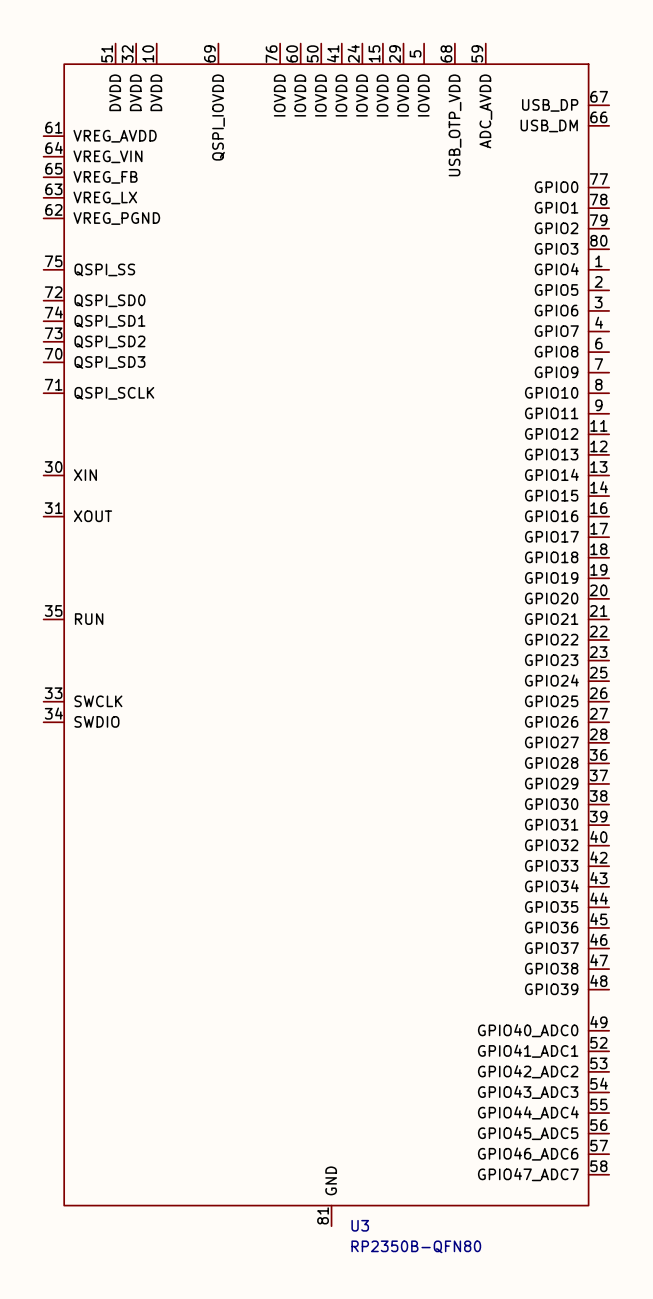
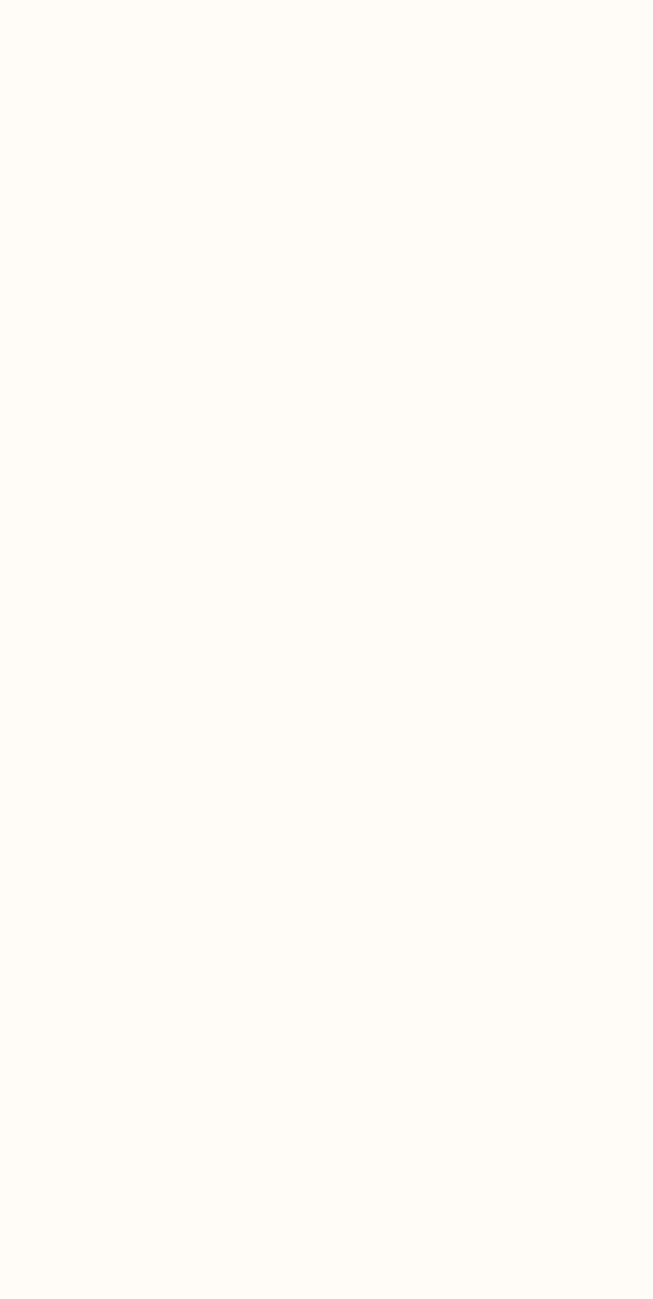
U3: RP2350B-QFN80 (326, 634) -> none

